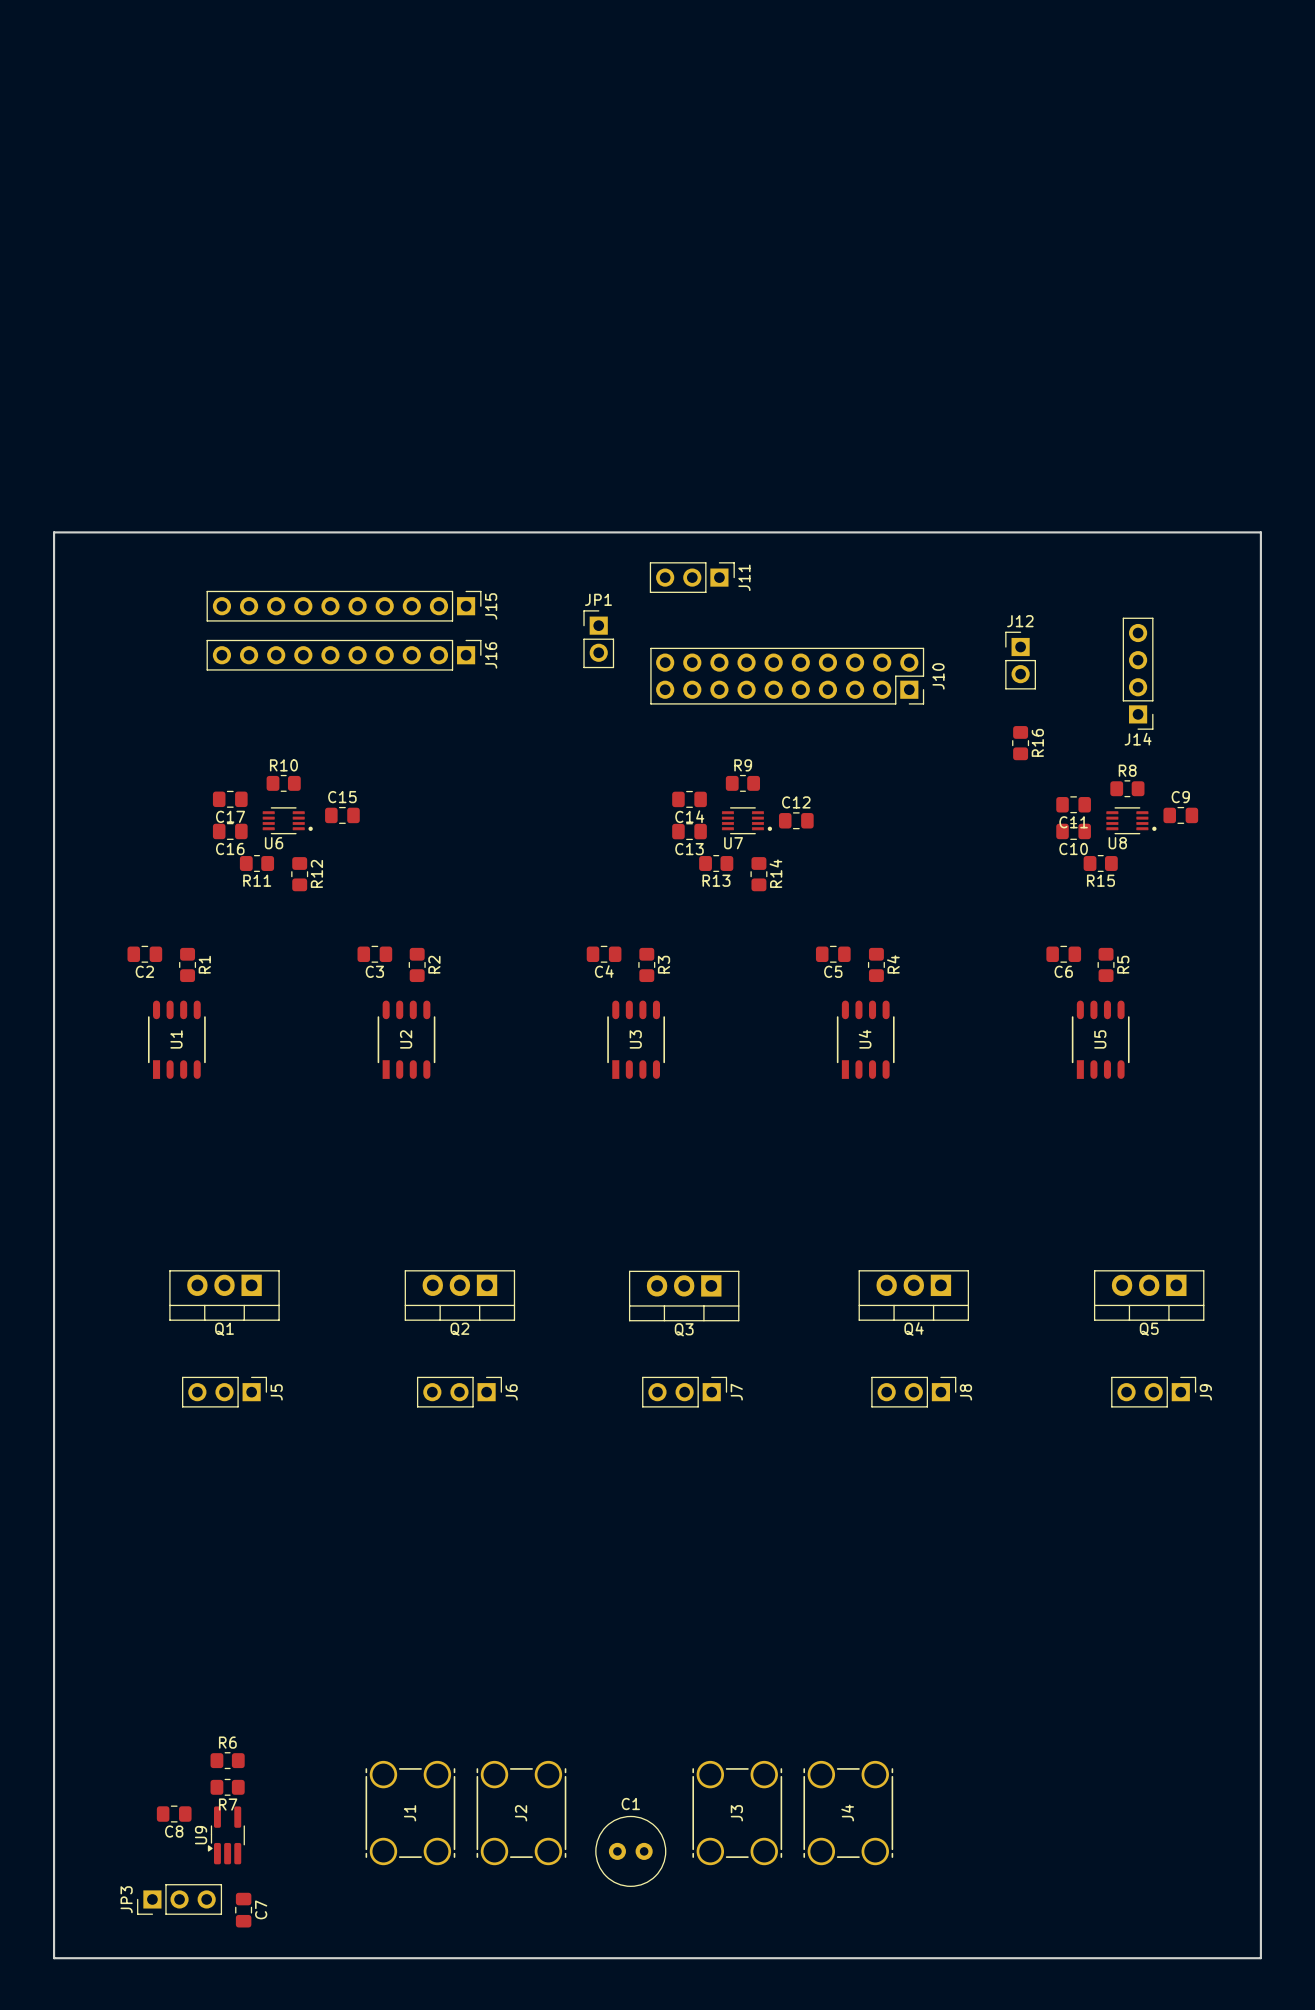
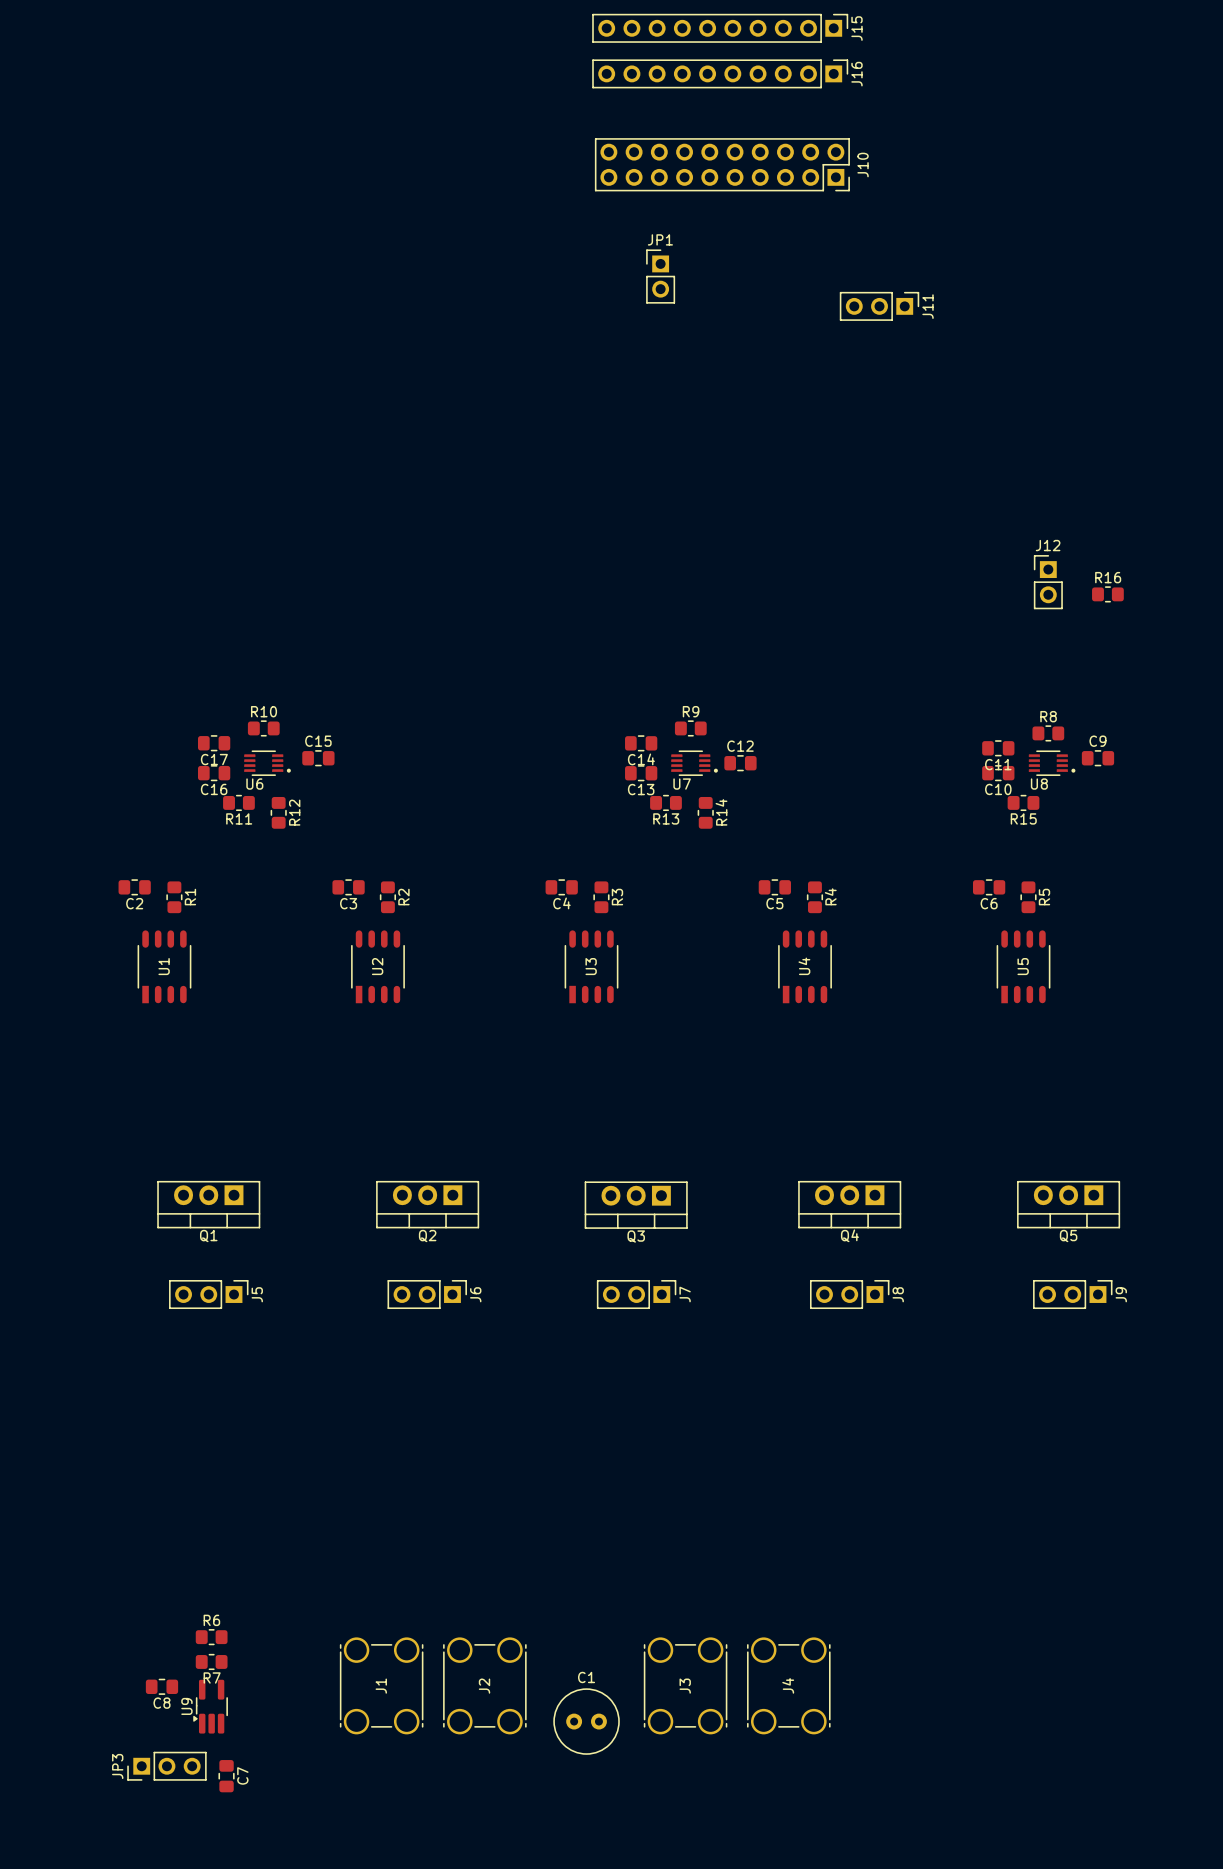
board edge: (54, 532) (1260, 532) (1260, 1958) (54, 1958) (54, 532) -> none
J11 position: (692, 577) -> (879, 306)
J15 position: (344, 606) -> (720, 28)
JP1 position: (598, 639) -> (660, 276)
J16 position: (344, 655) -> (720, 73)
J12 position: (1020, 660) -> (1048, 582)
J14: (1138, 673) -> none
J10 position: (787, 676) -> (722, 164)
R16 name position: R16 (1037, 742) -> R16 (1108, 577)
R16 rotation: 0° (1020, 743) -> 90° clockwise (1107, 594)
R16 position: (1020, 743) -> (1107, 594)

